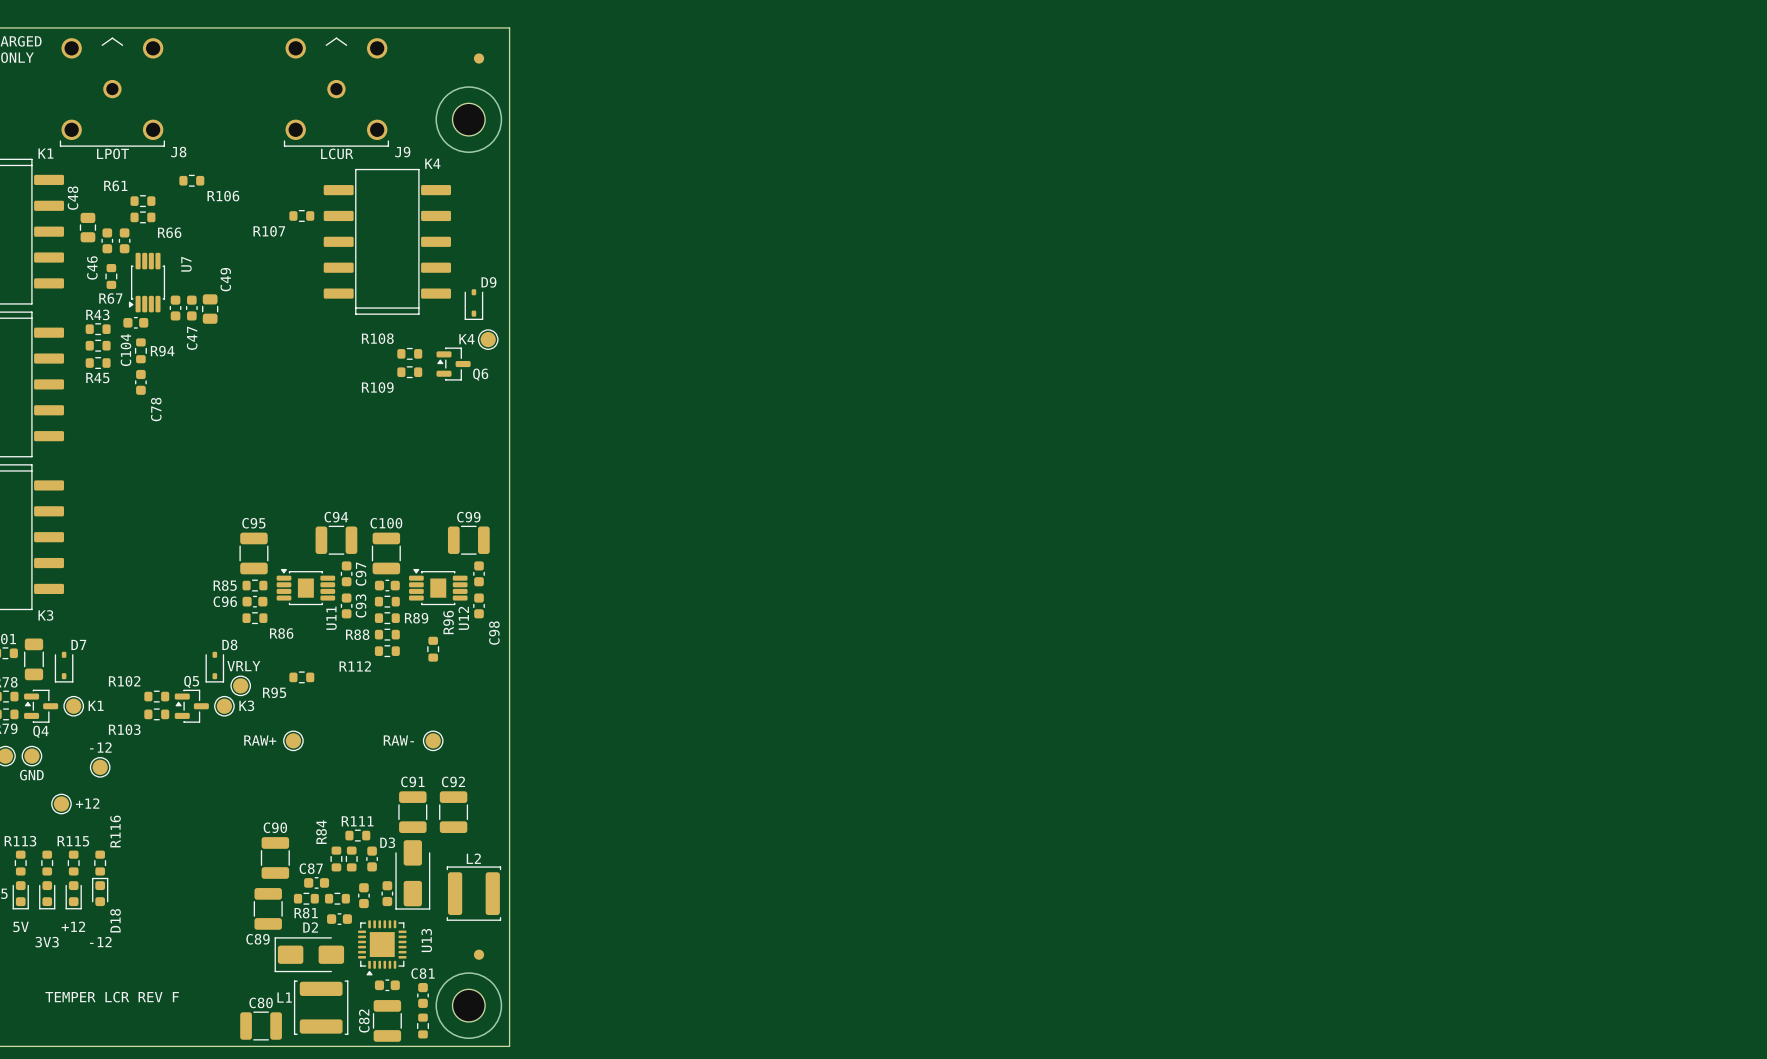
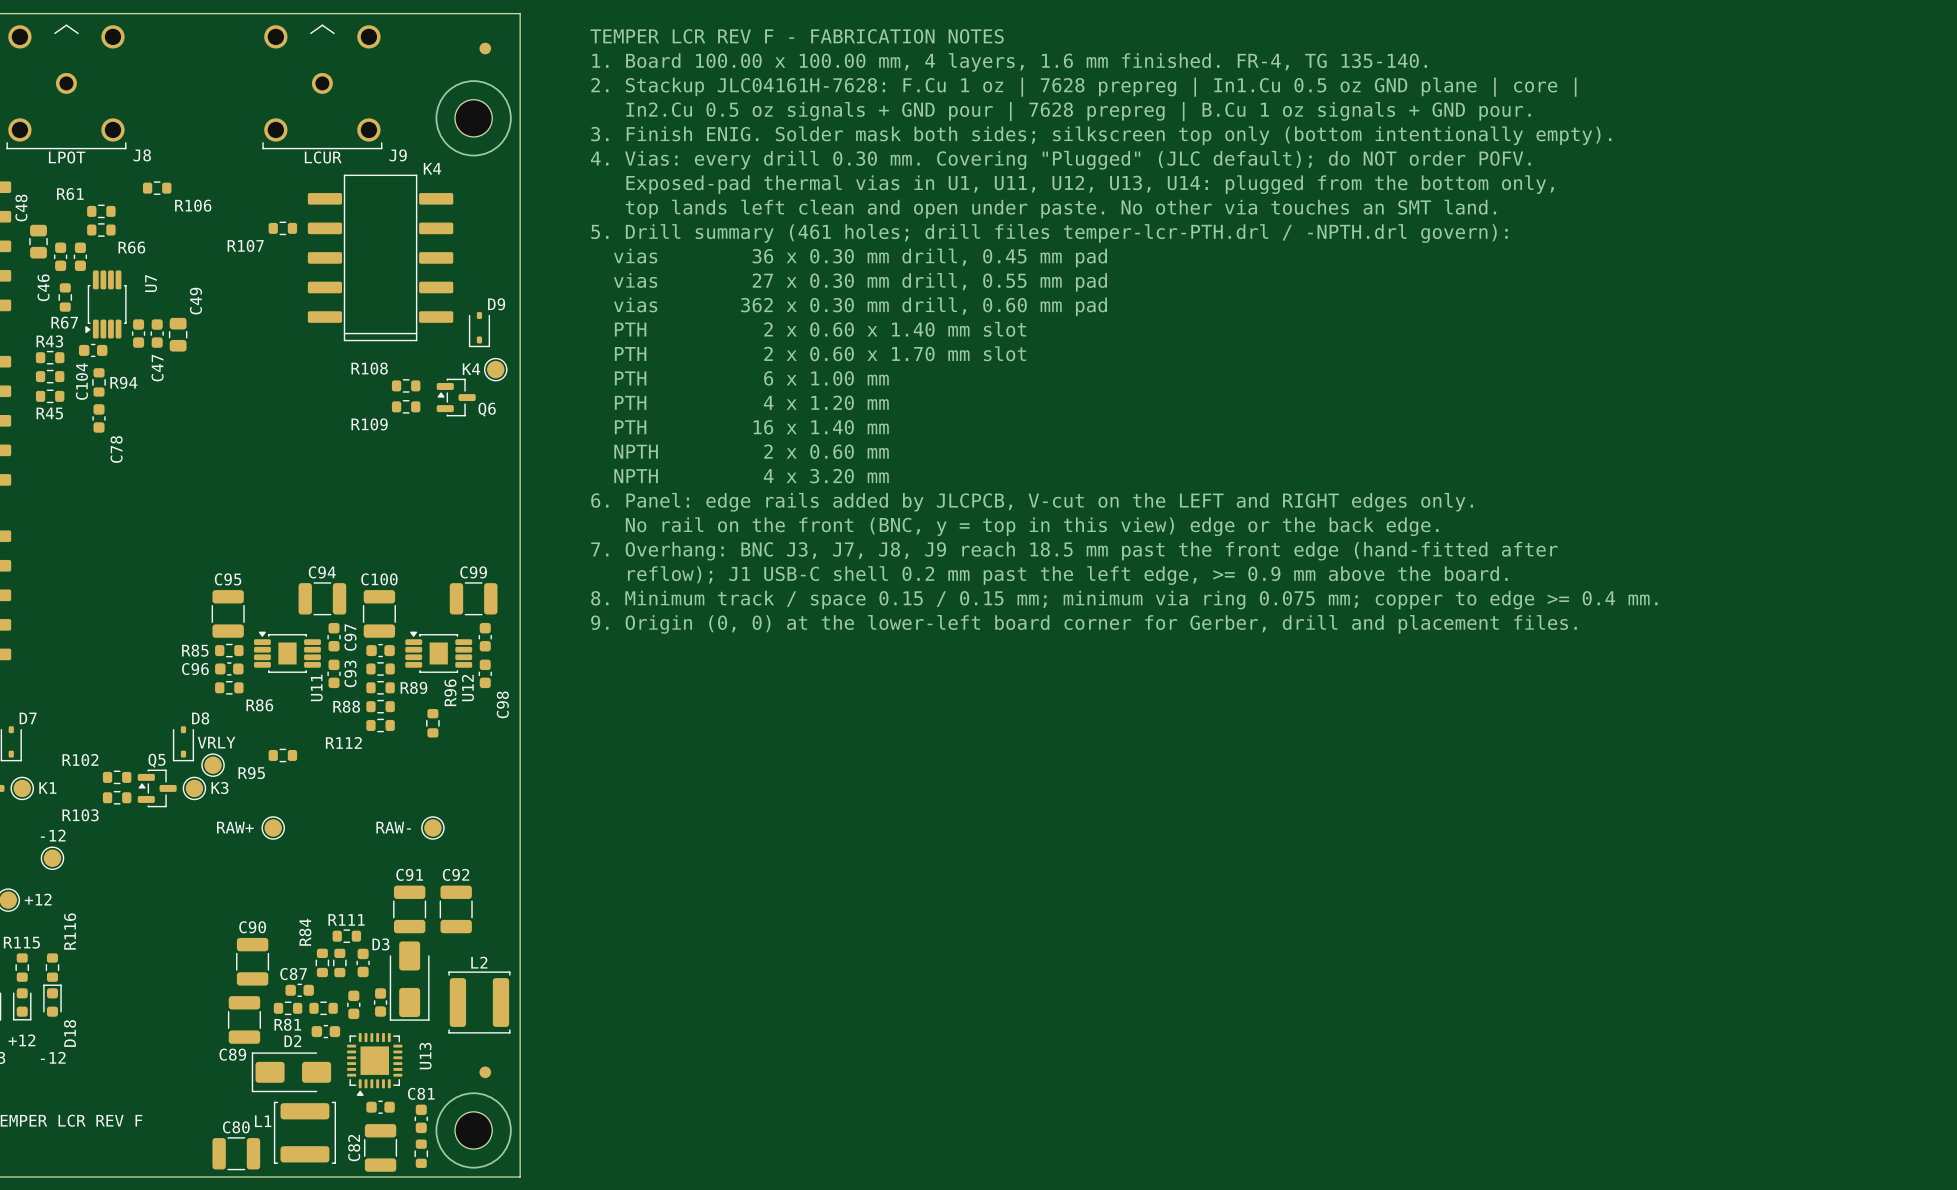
text: none -> TEMPER LCR REV F - FABRICATION NOTES (797, 36)
text: none -> 1. Board 100.00 x 100.00 mm, 4 layers, 1.6 mm finished. FR-4, TG 135-140. (1009, 62)
text: none -> 2. Stackup JLC04161H-7628: F.Cu 1 oz | 7628 prepreg | In1.Cu 0.5 oz GND plane | core | (1083, 87)
text: none -> In2.Cu 0.5 oz signals + GND pour | 7628 prepreg | B.Cu 1 oz signals + GND pour. (1078, 111)
text: none -> 3. Finish ENIG. Solder mask both sides; silkscreen top only (bottom intentionally empty). (1101, 135)
text: none -> 4. Vias: every drill 0.30 mm. Covering "Plugged" (JLC default); do NOT order POFV. (1060, 160)
text: none -> Exposed-pad thermal vias in U1, U11, U12, U13, U14: plugged from the bottom only, (1090, 184)
text: none -> top lands left clean and open under paste. No other via touches an SMT land. (1060, 209)
text: none -> 5. Drill summary (461 holes; drill files temper-lcr-PTH.drl / -NPTH.drl govern): (1049, 233)
text: none -> vias 36 x 0.30 mm drill, 0.45 mm pad (860, 257)
text: none -> vias 27 x 0.30 mm drill, 0.55 mm pad (860, 282)
text: none -> vias 362 x 0.30 mm drill, 0.60 mm pad (860, 306)
text: none -> PTH 2 x 0.60 x 1.40 mm slot (820, 329)
text: none -> PTH 2 x 0.60 x 1.70 mm slot (820, 353)
text: none -> PTH 6 x 1.00 mm (751, 378)
text: none -> PTH 4 x 1.20 mm (751, 402)
text: none -> PTH 16 x 1.40 mm (751, 427)
text: none -> NPTH 2 x 0.60 mm (751, 451)
text: none -> NPTH 4 x 3.20 mm (751, 476)
text: none -> 6. Panel: edge rails added by JLCPCB, V-cut on the LEFT and RIGHT edges only. (1032, 502)
text: none -> No rail on the front (BNC, y = top in this view) edge or the back edge. (1032, 526)
text: none -> 7. Overhang: BNC J3, J7, J8, J9 reach 18.5 mm past the front edge (hand-fitted after (1074, 551)
text: none -> reflow); J1 USB-C shell 0.2 mm past the left edge, >= 0.9 mm above the board. (1067, 575)
text: none -> 8. Minimum track / space 0.15 / 0.15 mm; minimum via ring 0.075 mm; copper to edge >= 0.4 mm. (1124, 600)
text: none -> 9. Origin (0, 0) at the lower-left board corner for Gerber, drill and placement files. (1083, 624)

